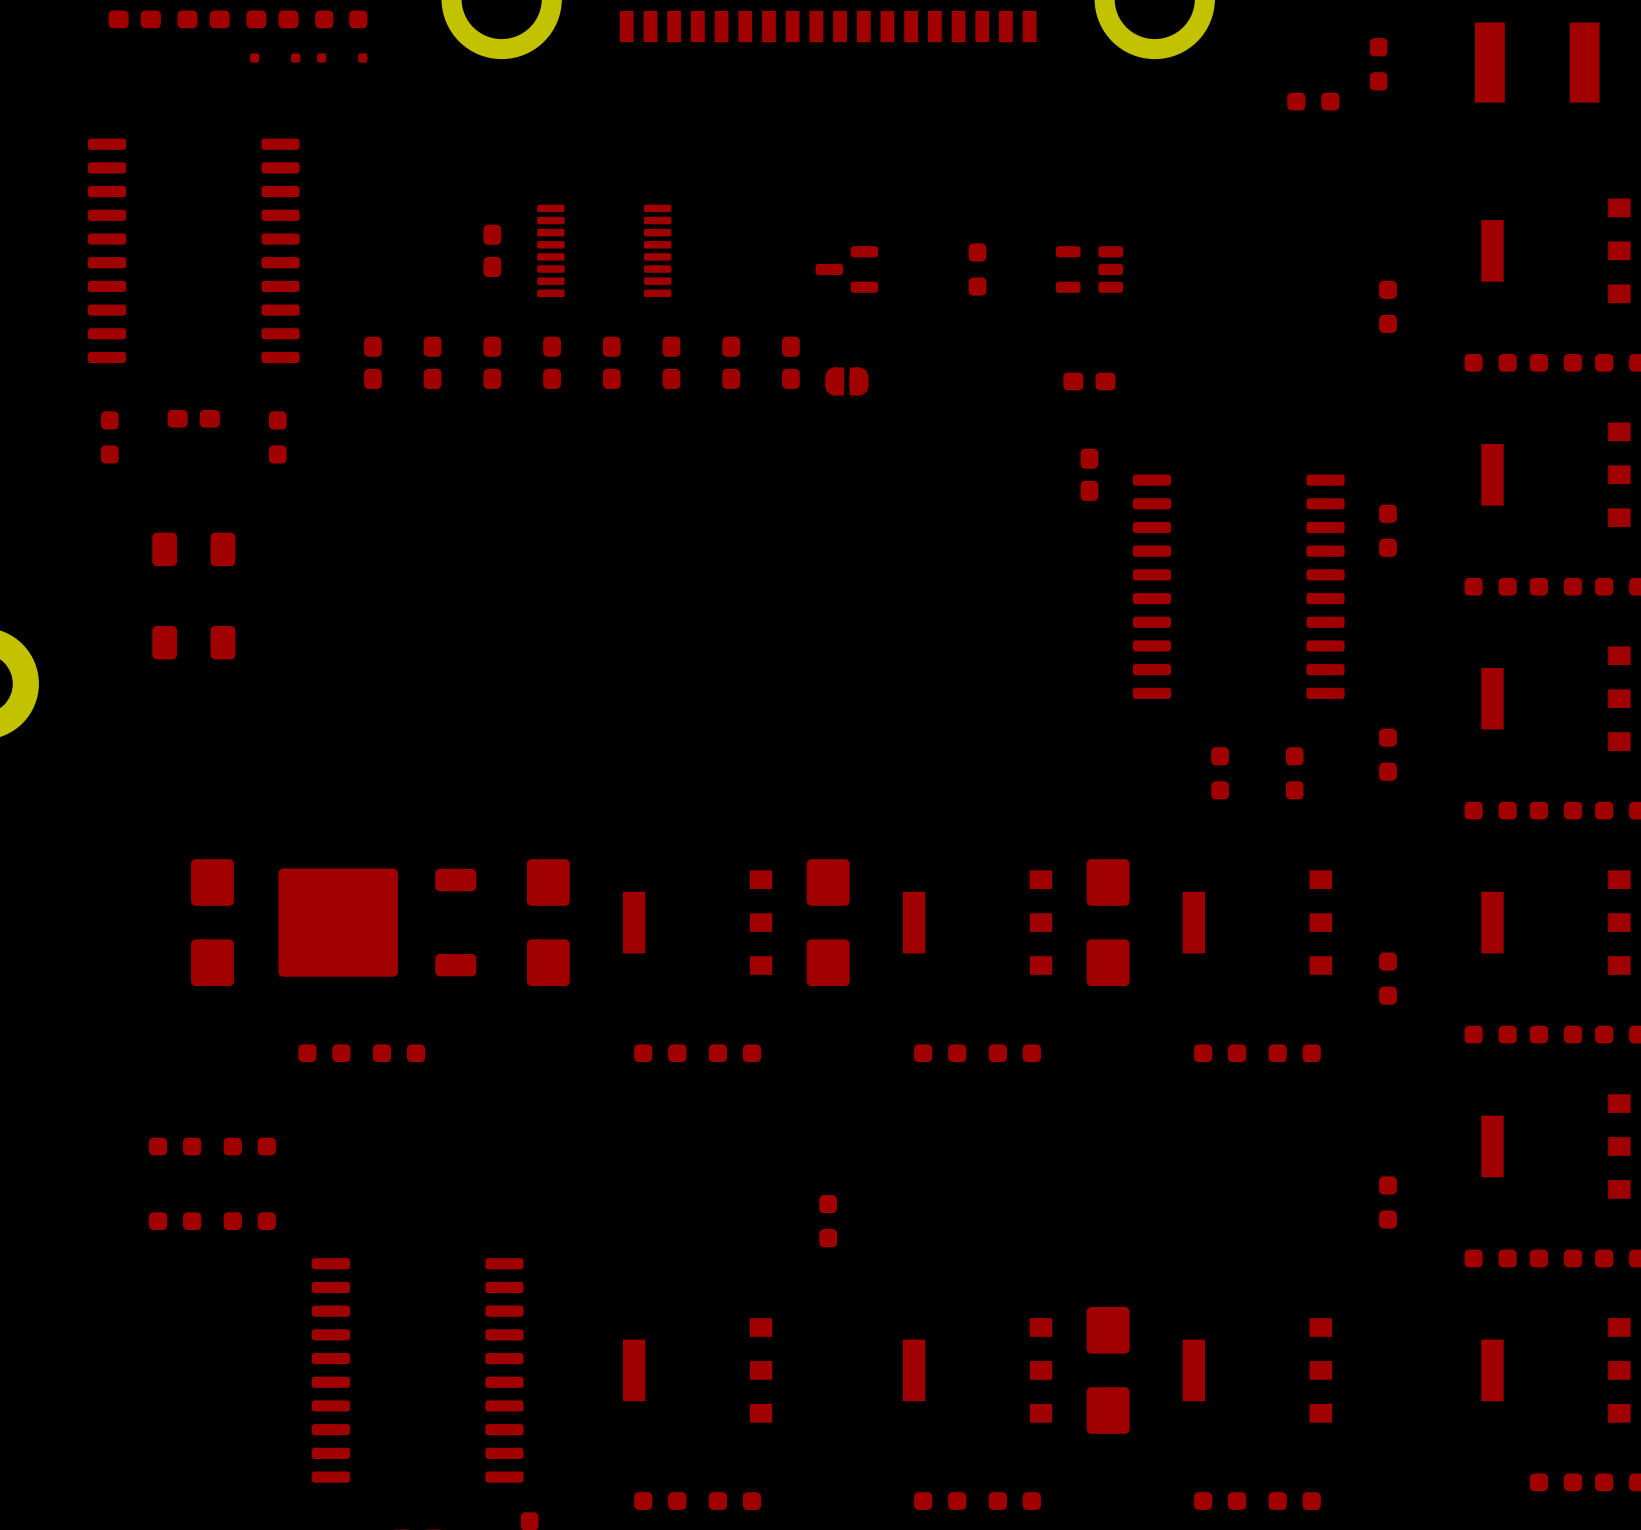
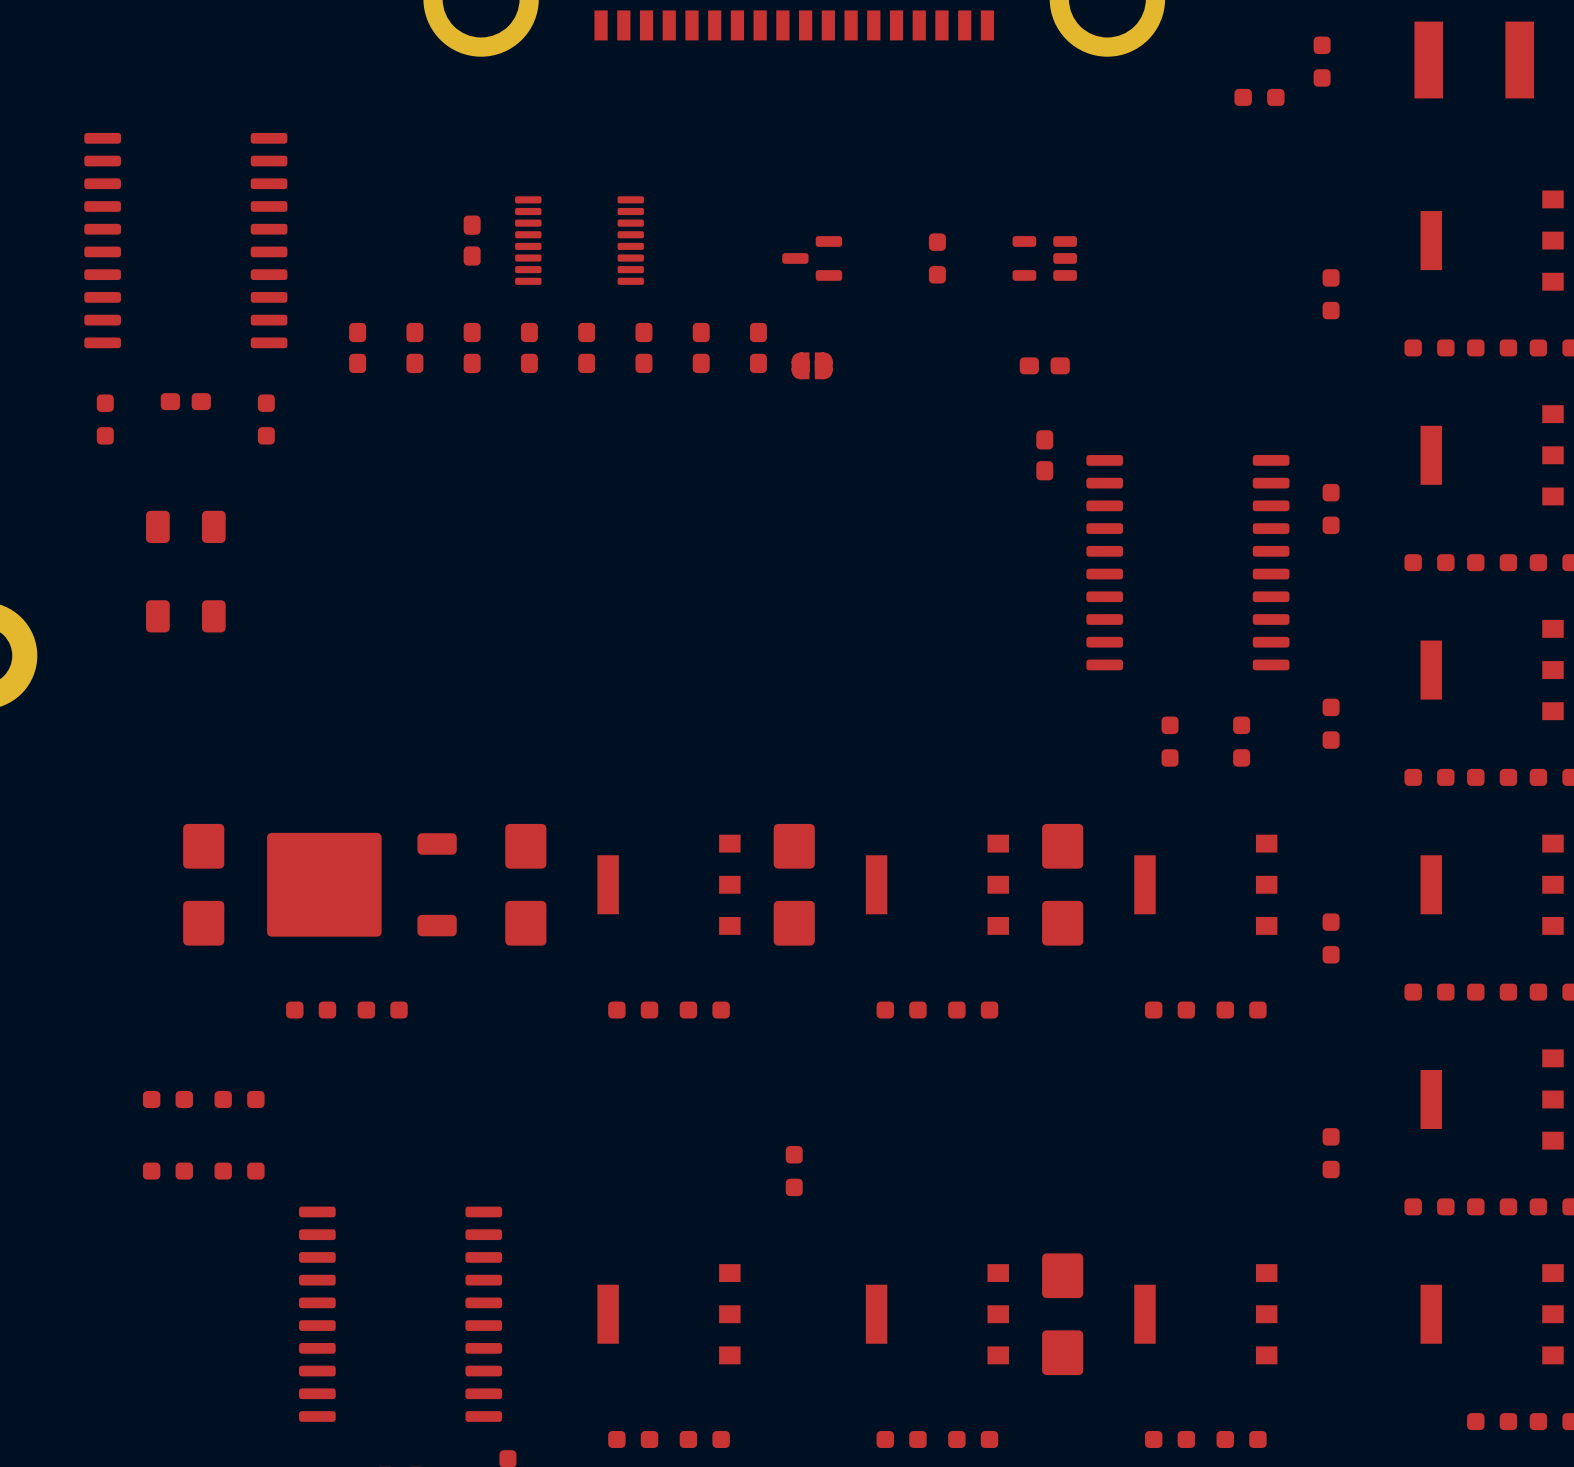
part: (134, 19) -> none
part: (203, 19) -> none
part: (272, 19) -> none
part: (341, 19) -> none
part: (275, 58) -> none
part: (342, 58) -> none

